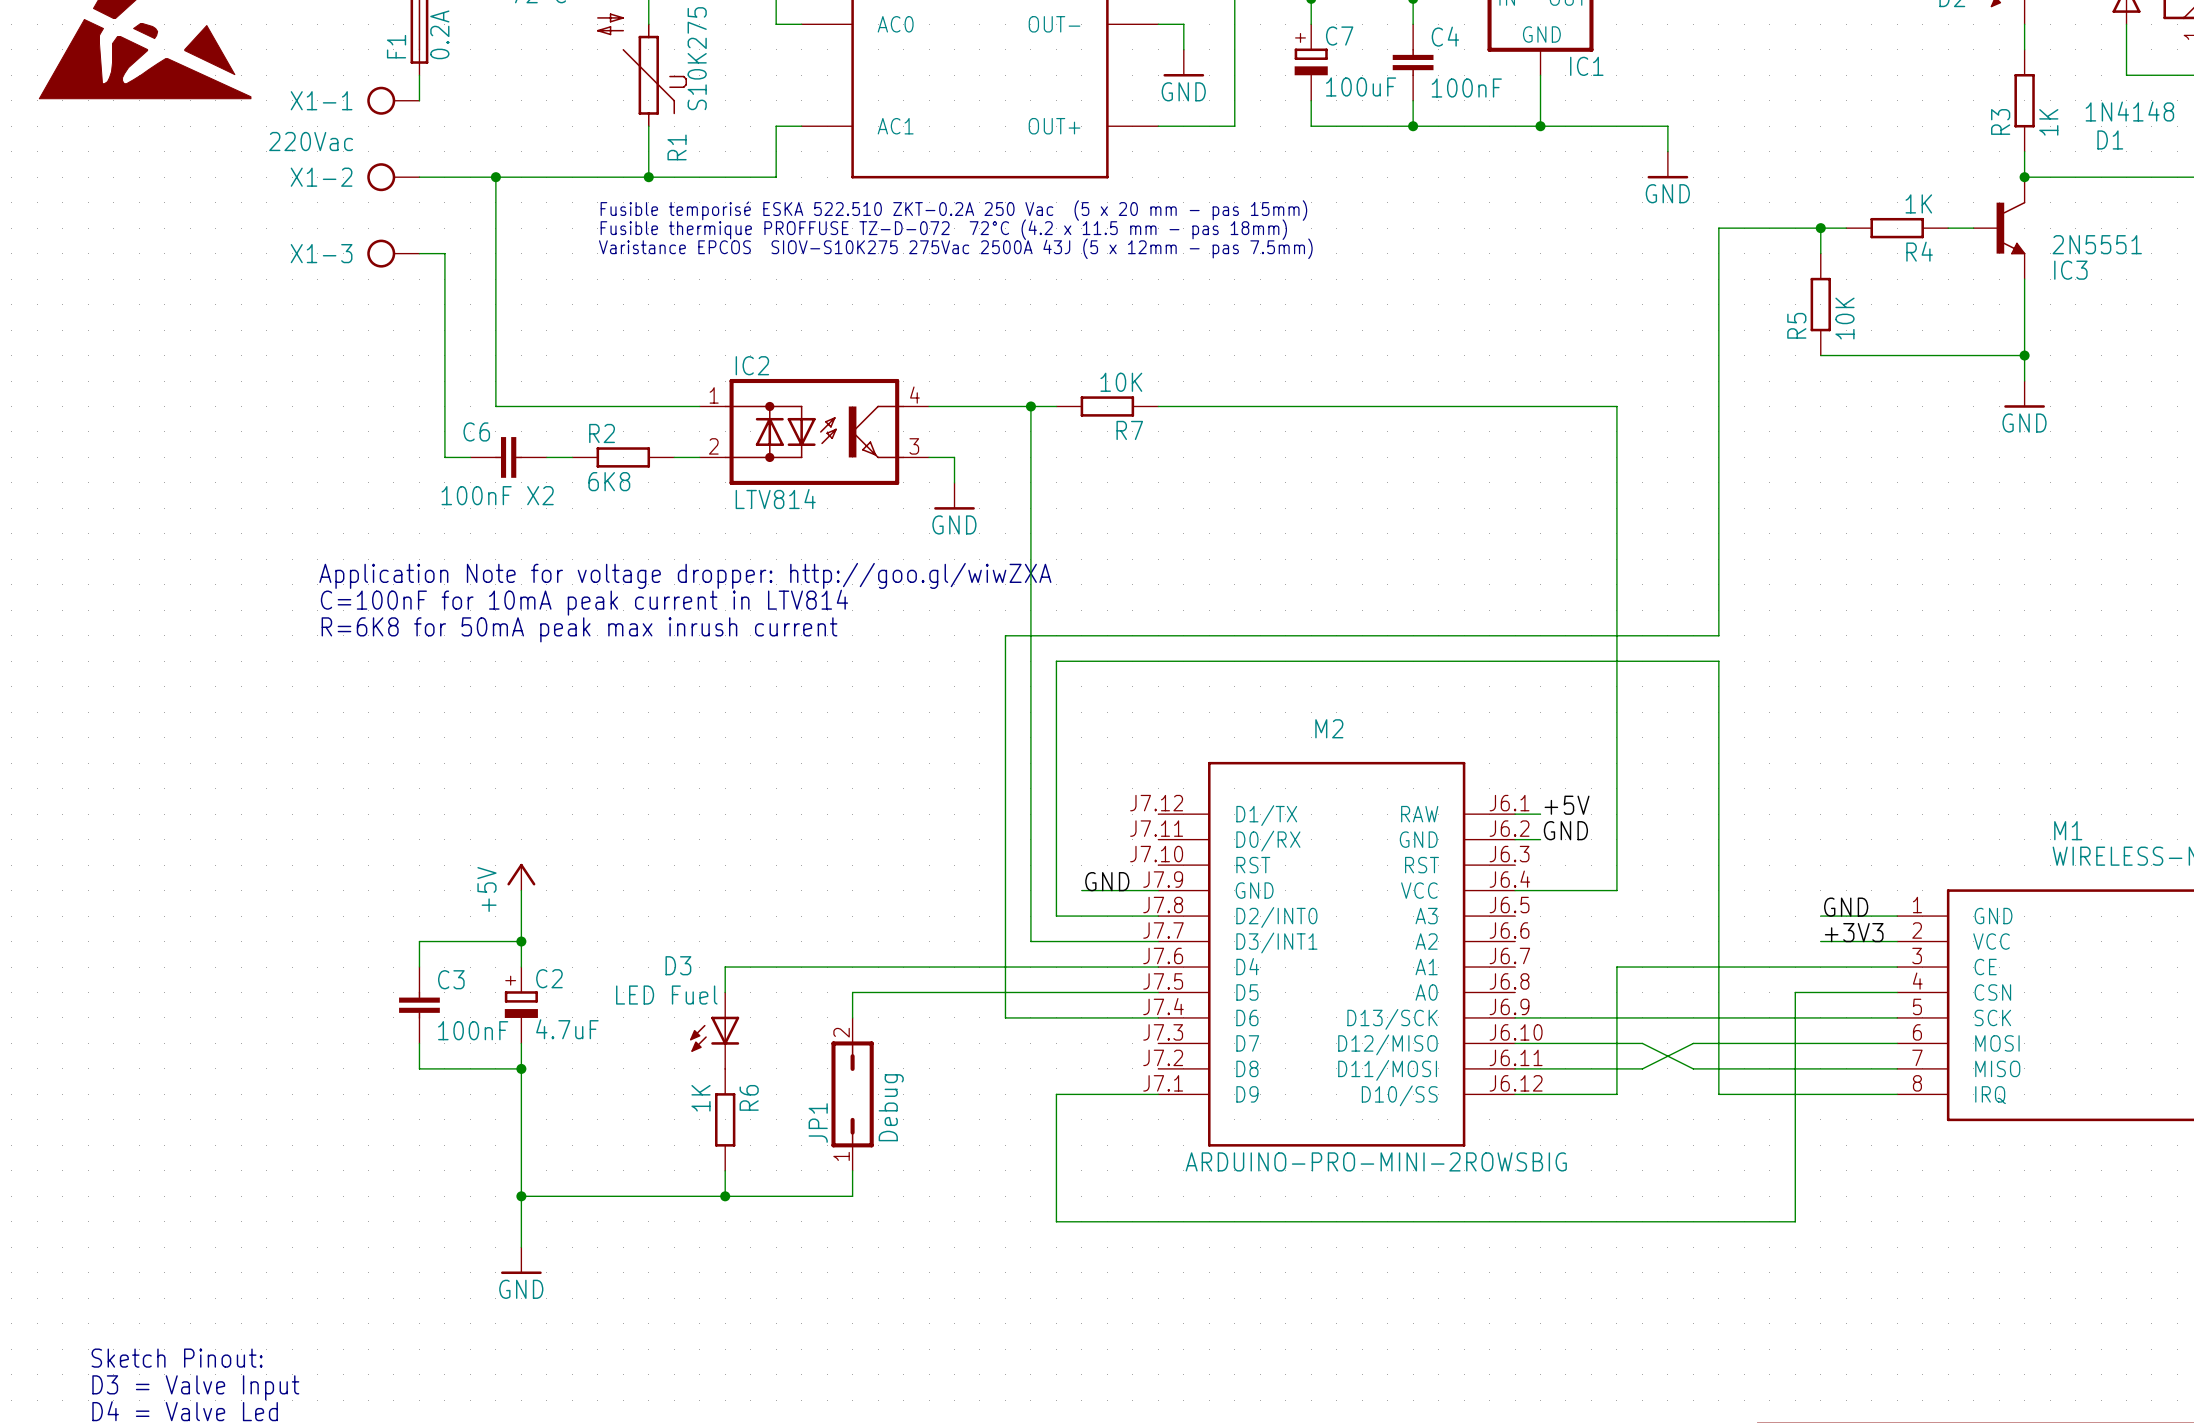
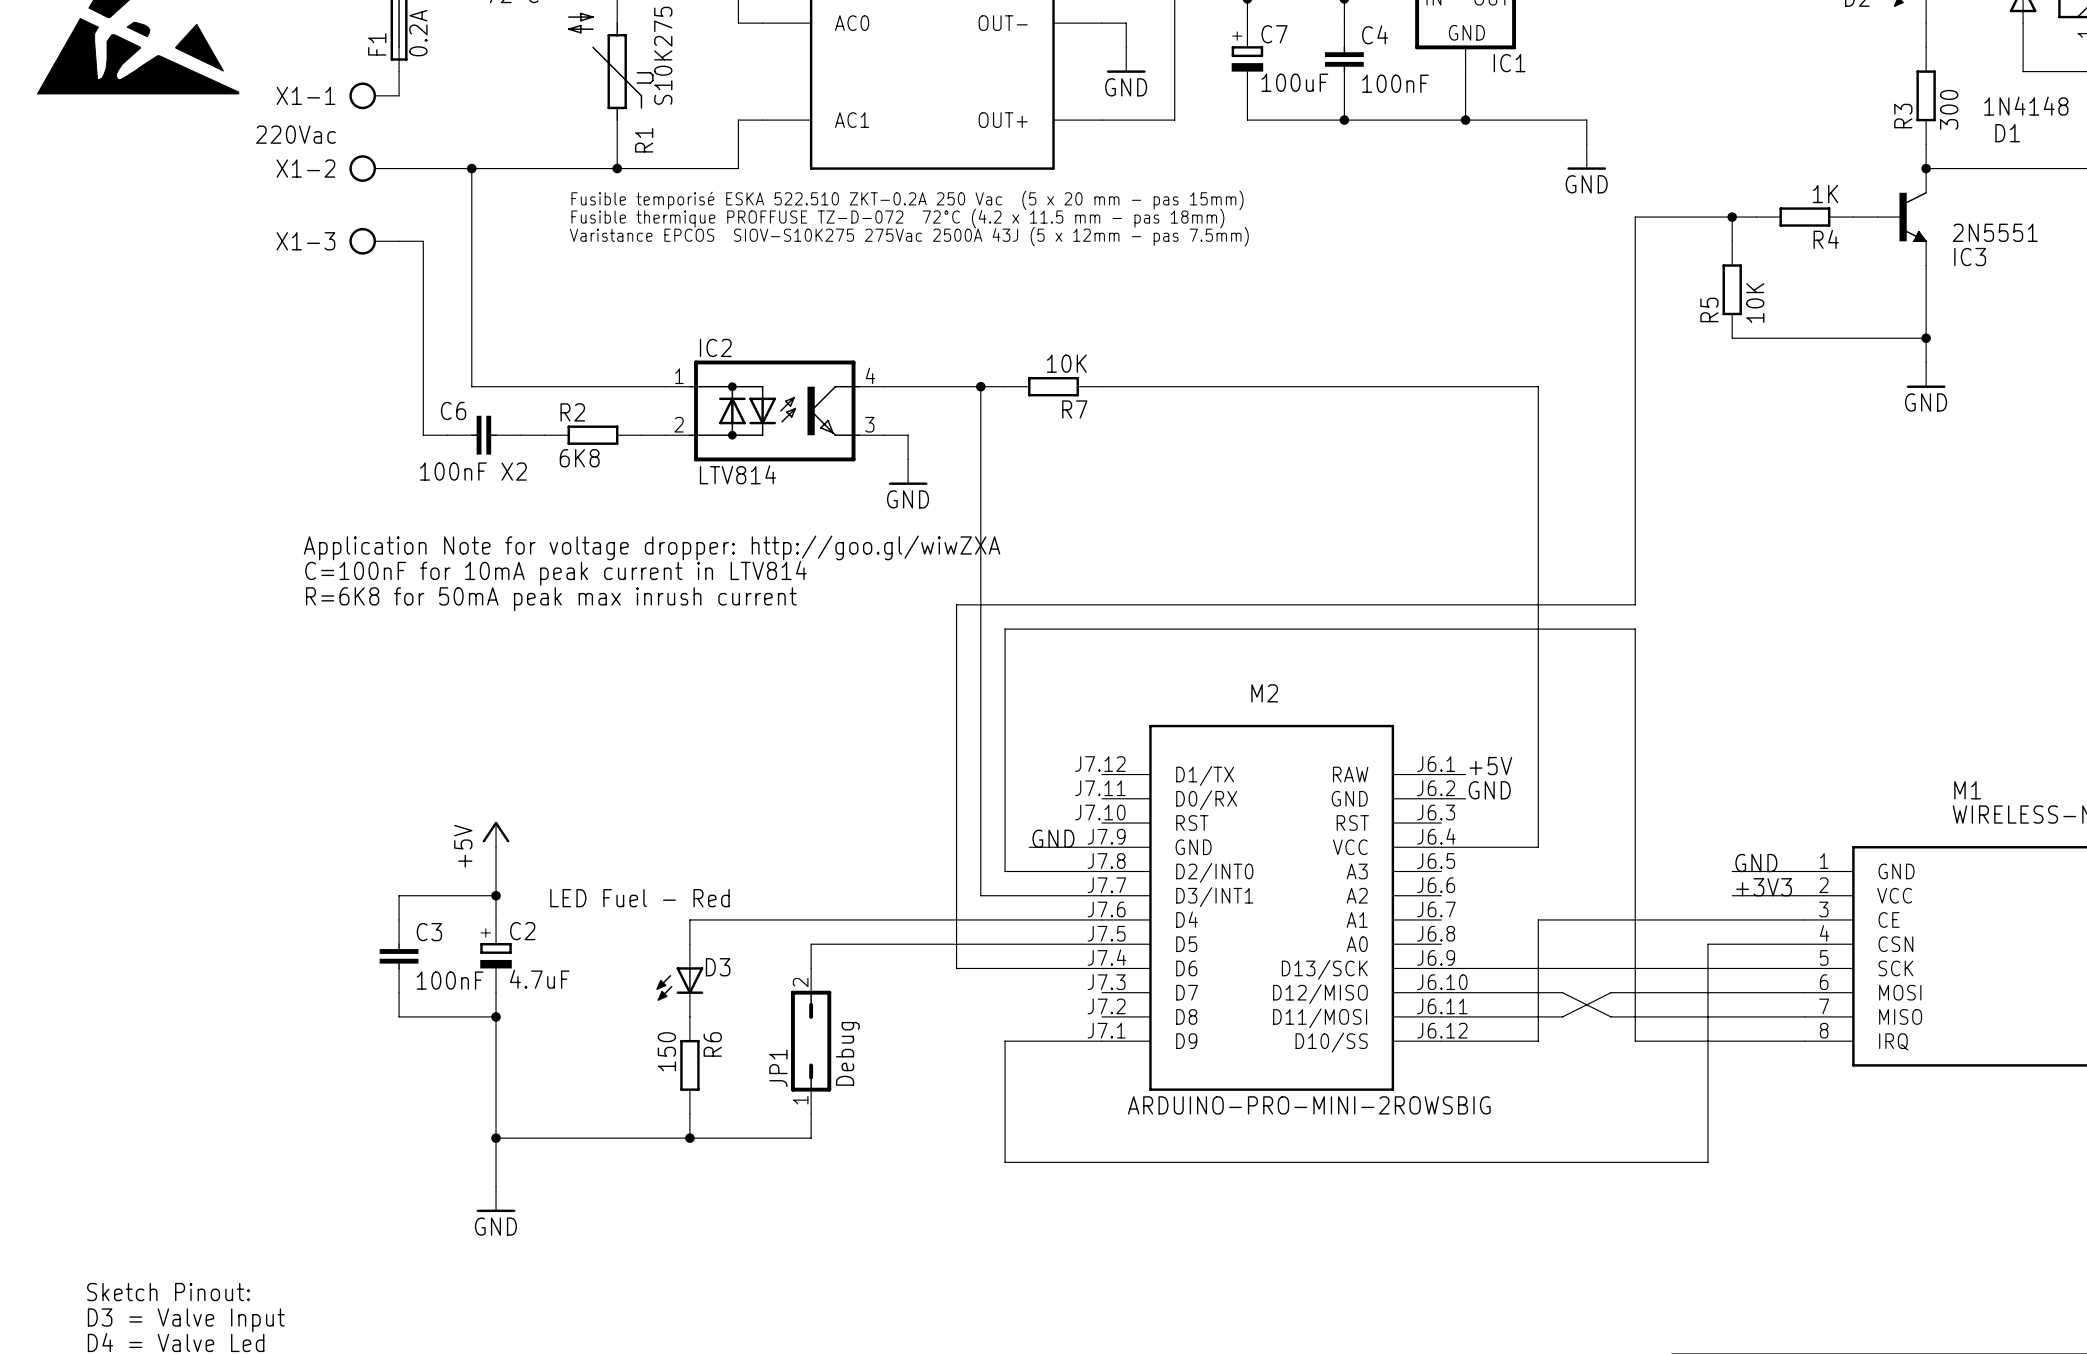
R3 value: 1K (2048, 122) -> 300 (1949, 109)
D3 name position: D3 (678, 965) -> D3 (718, 967)
D3 value: LED Fuel (666, 995) -> LED Fuel - Red (639, 898)
R6 value: 1K (701, 1098) -> 150 (666, 1051)

